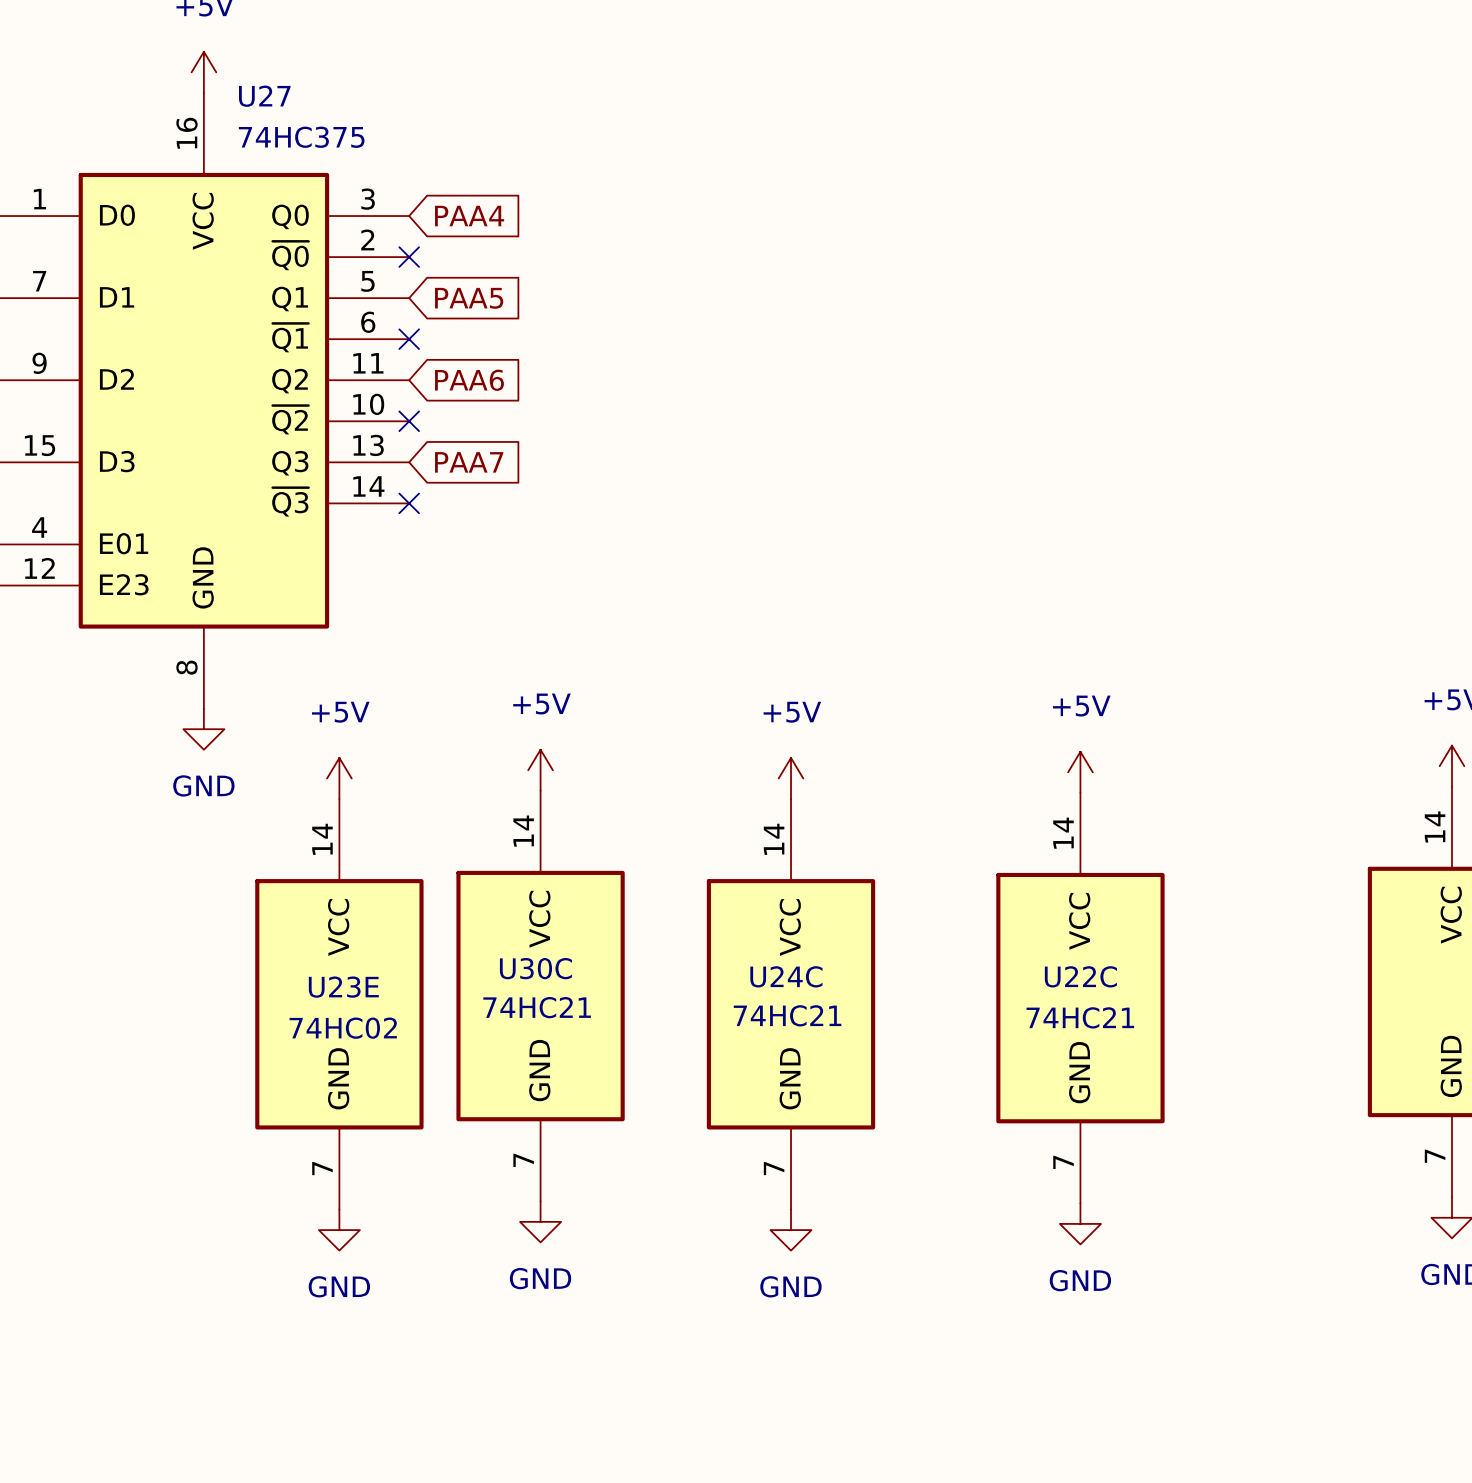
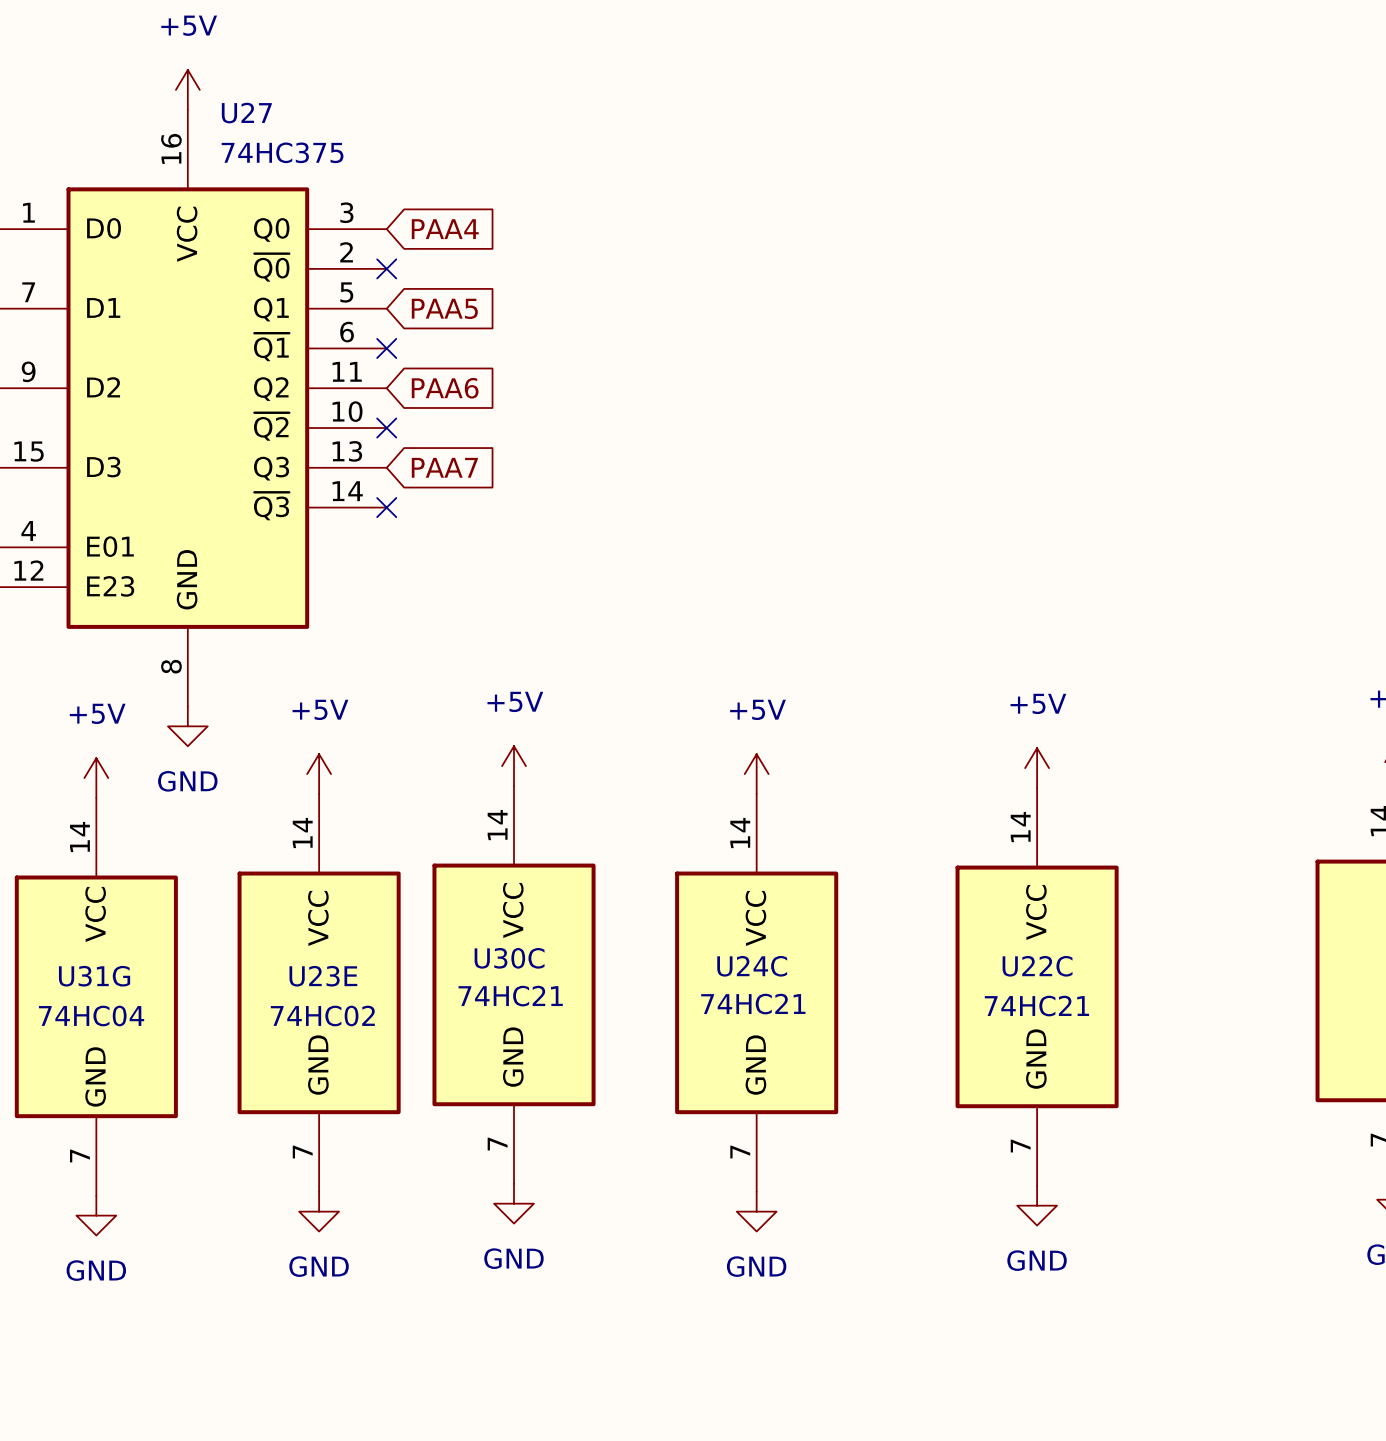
power symbol: none -> +5V (96, 778)
U31G: none -> 74HC04 (96, 996)
power symbol: none -> GND (96, 1215)

